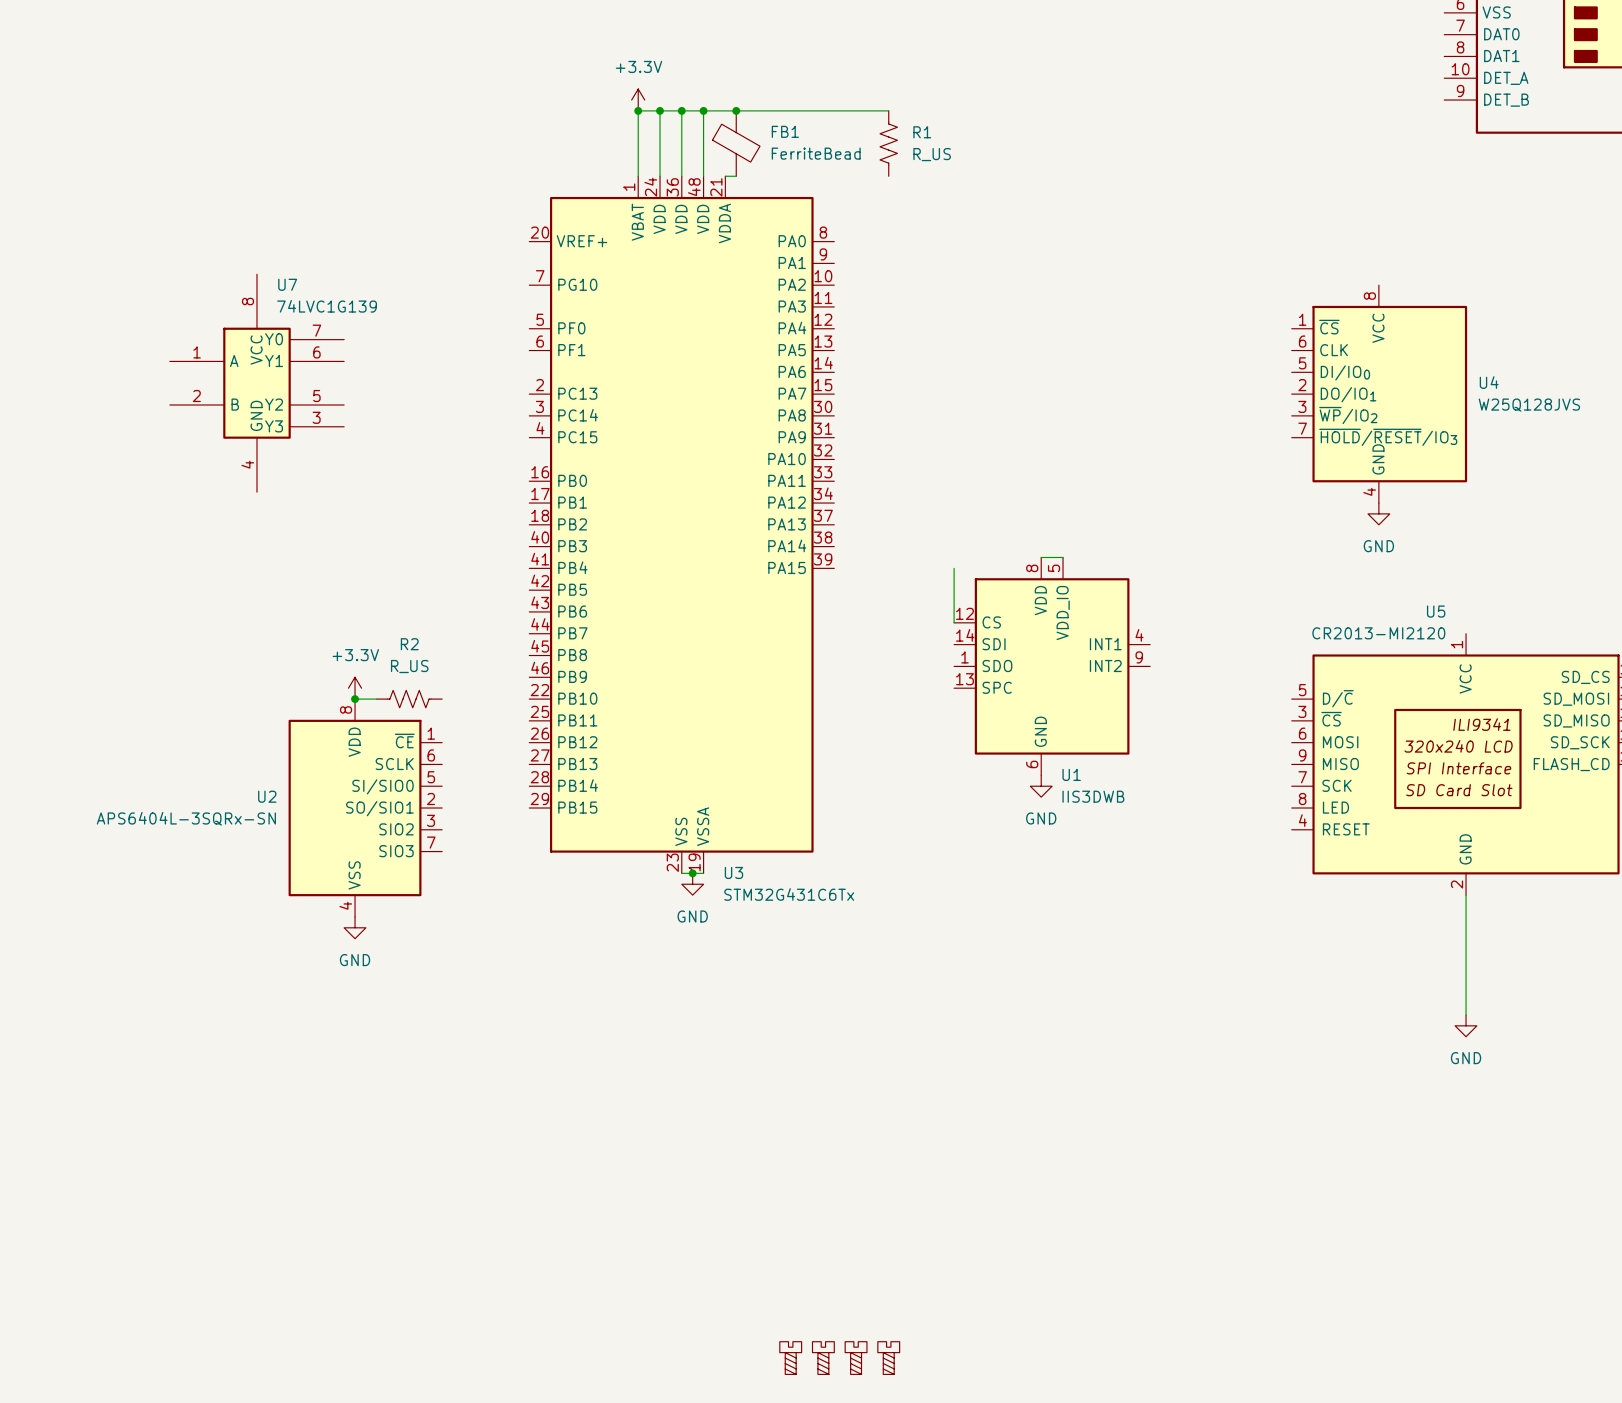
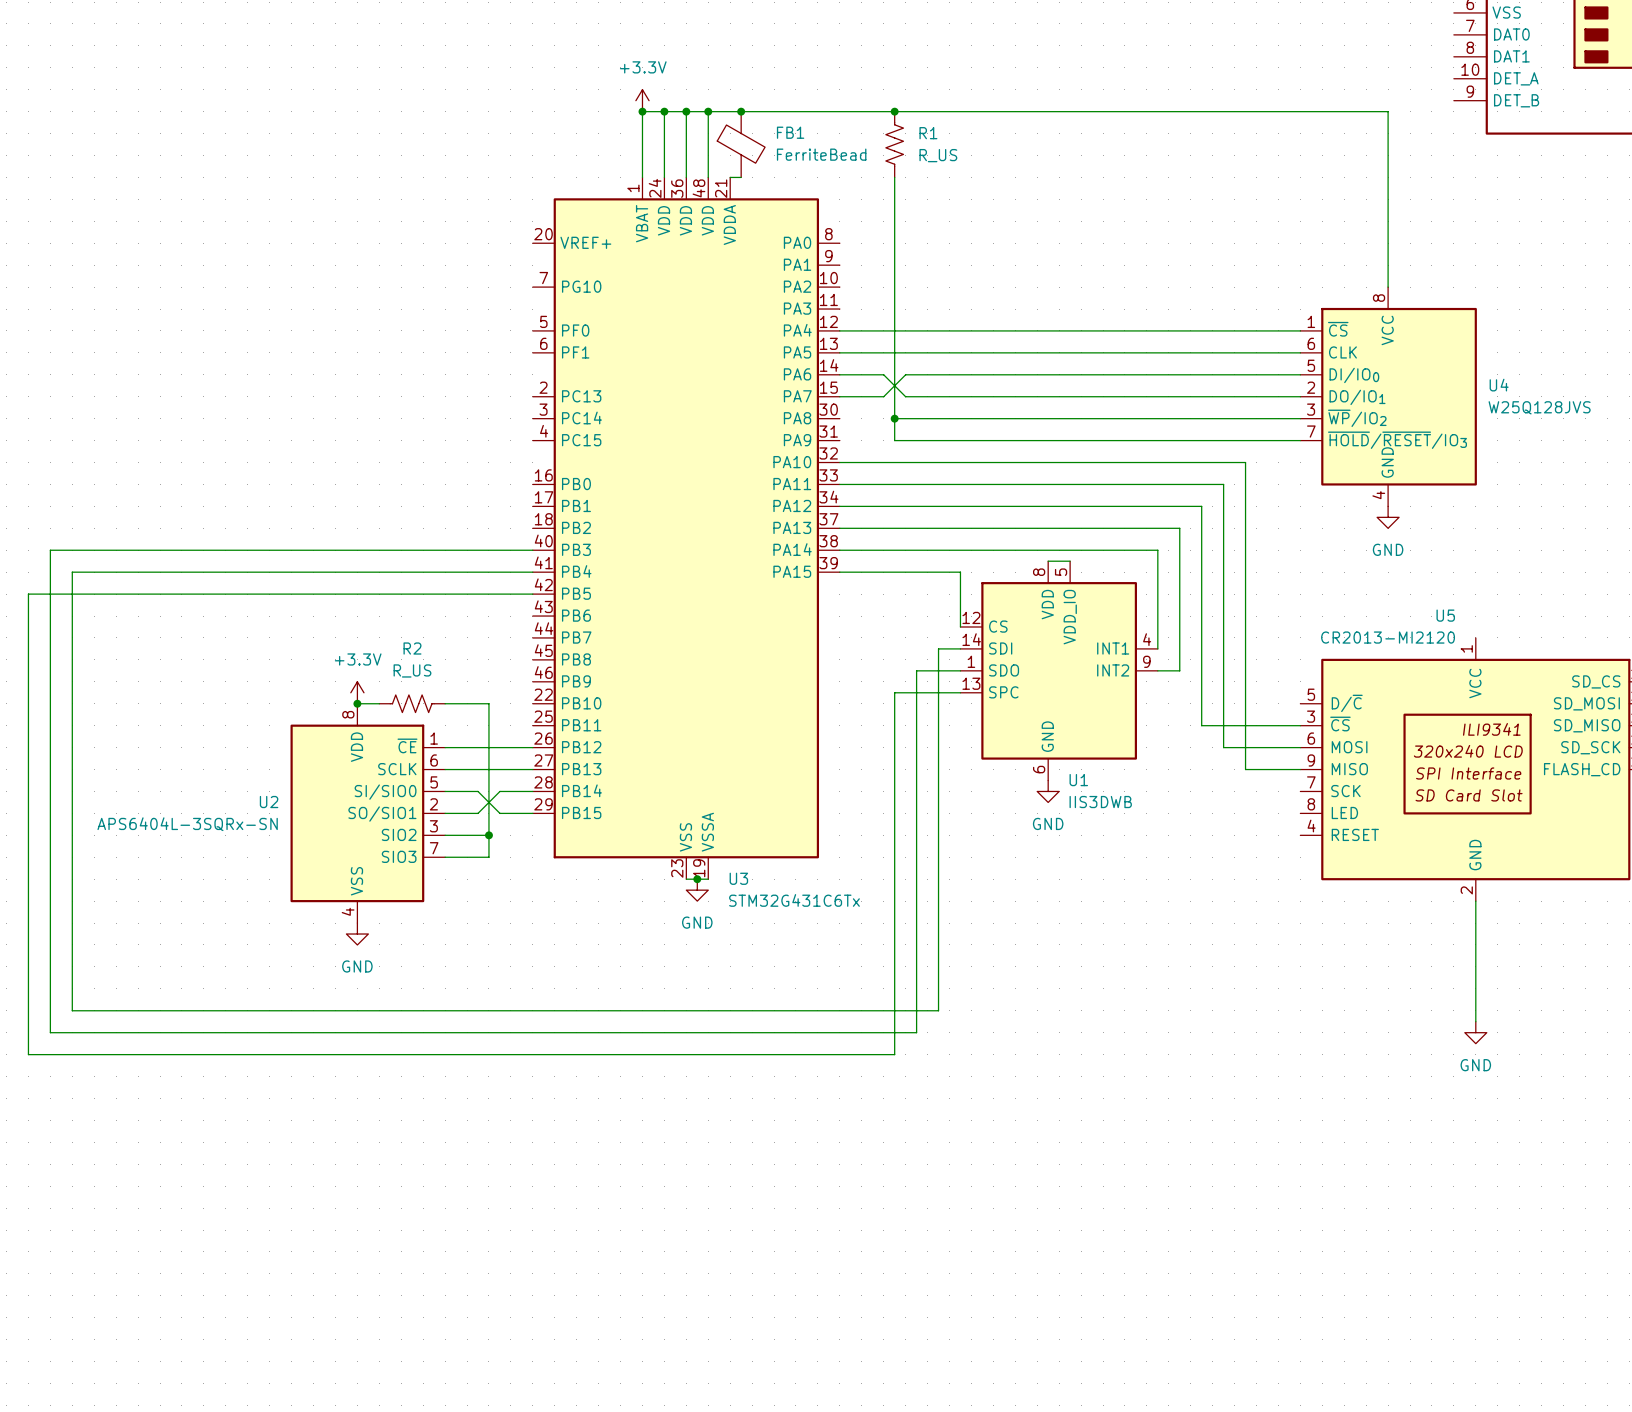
wire: none -> (894, 111) (1388, 111) (1388, 287)
junction: none -> (894, 111)
wire: none -> (894, 177) (894, 440) (1300, 440)
wire: none -> (839, 330) (1300, 330)
wire: none -> (839, 352) (1300, 352)
wire: none -> (839, 374) (883, 374) (905, 396) (1300, 396)
wire: none -> (1300, 374) (905, 374) (883, 396) (839, 396)
U7: 74LVC1G139 (256, 383) -> none
wire: none -> (894, 418) (1300, 418)
junction: none -> (894, 418)
wire: none -> (839, 462) (1245, 462) (1245, 769) (1300, 769)
wire: none -> (839, 484) (1223, 484) (1223, 747) (1300, 747)
wire: none -> (839, 506) (1201, 506) (1201, 725) (1300, 725)
wire: none -> (839, 528) (1179, 528) (1179, 670) (1157, 670)
wire: none -> (532, 550) (50, 550) (50, 1032) (916, 1032) (916, 670) (960, 670)
wire: none -> (839, 550) (1157, 550) (1157, 648)
wire: none -> (532, 572) (72, 572) (72, 1010) (938, 1010) (938, 648) (960, 648)
wire: none -> (839, 572) (960, 572)
wire: none -> (532, 594) (28, 594) (28, 1054) (894, 1054) (894, 692) (960, 692)
wire: none -> (445, 703) (488, 703) (488, 857) (445, 857)
wire: none -> (445, 747) (532, 747)
wire: none -> (445, 769) (532, 769)
wire: none -> (445, 791) (478, 791) (499, 813) (532, 813)
wire: none -> (532, 791) (499, 791) (478, 813) (445, 813)
wire: none -> (445, 835) (488, 835)
junction: none -> (488, 835)
part: (790, 1358) -> none
part: (823, 1358) -> none
part: (856, 1358) -> none
part: (888, 1358) -> none

